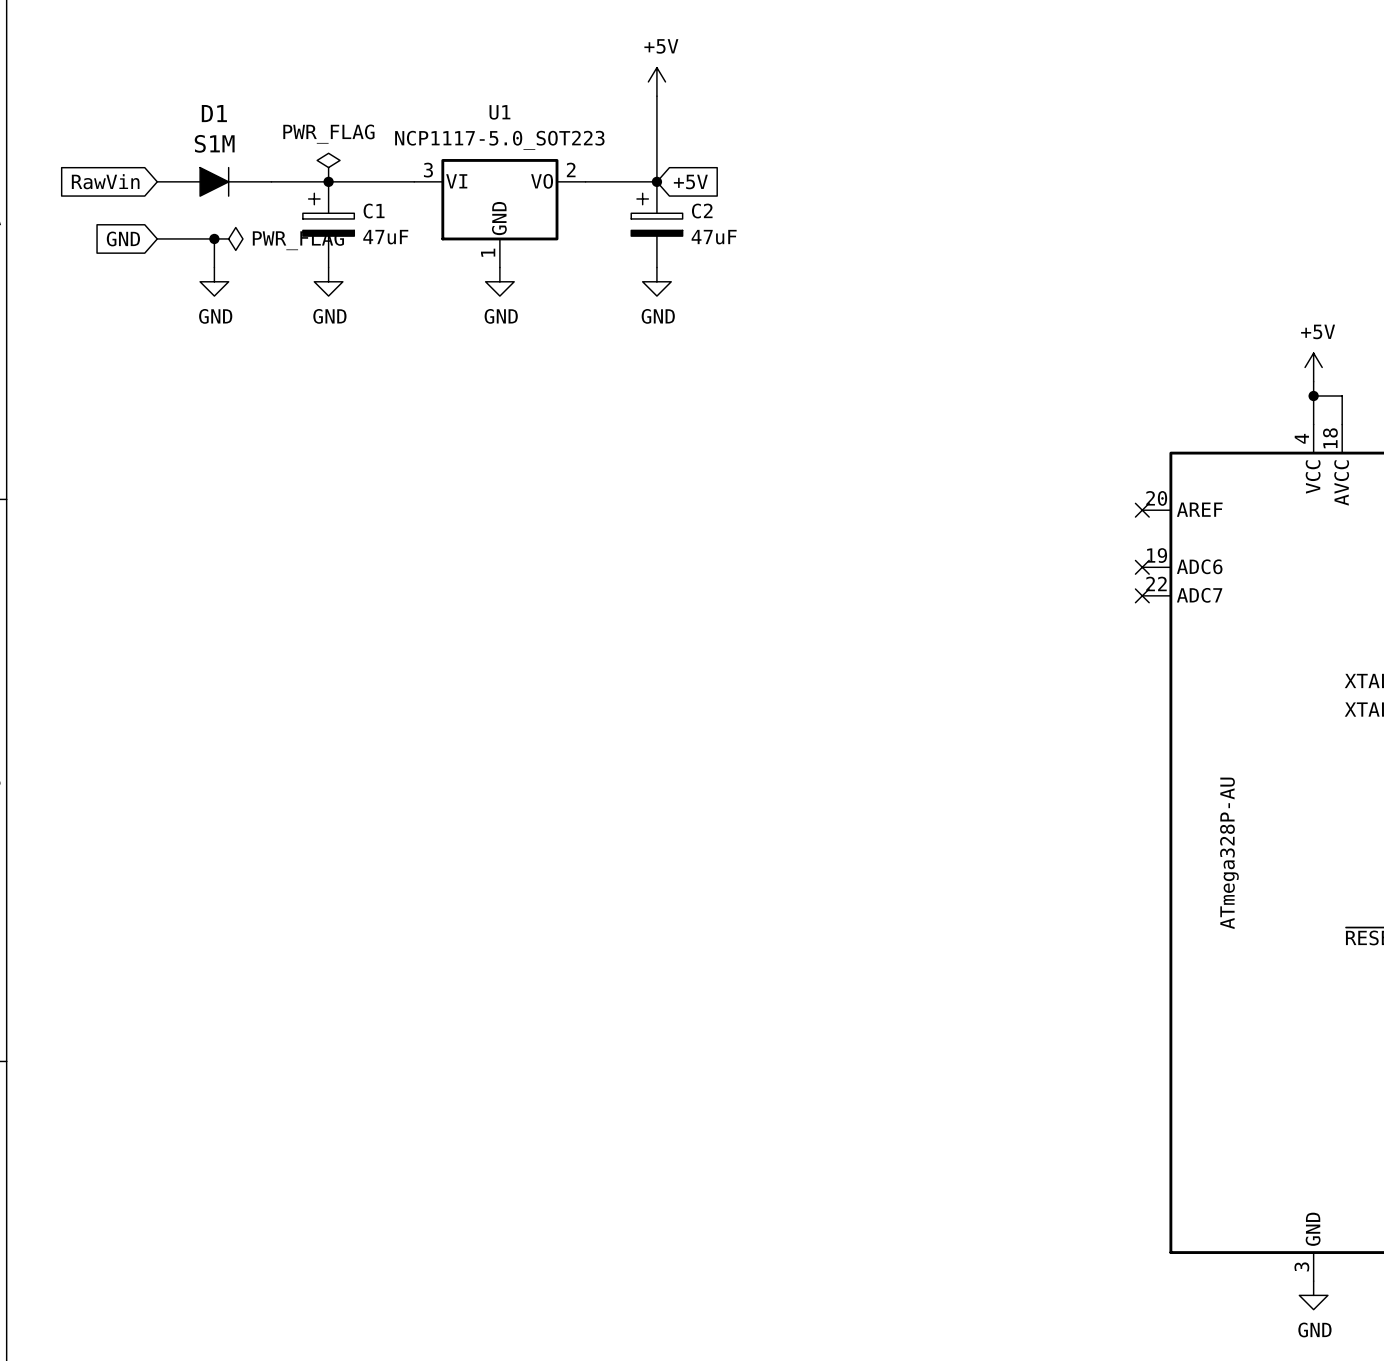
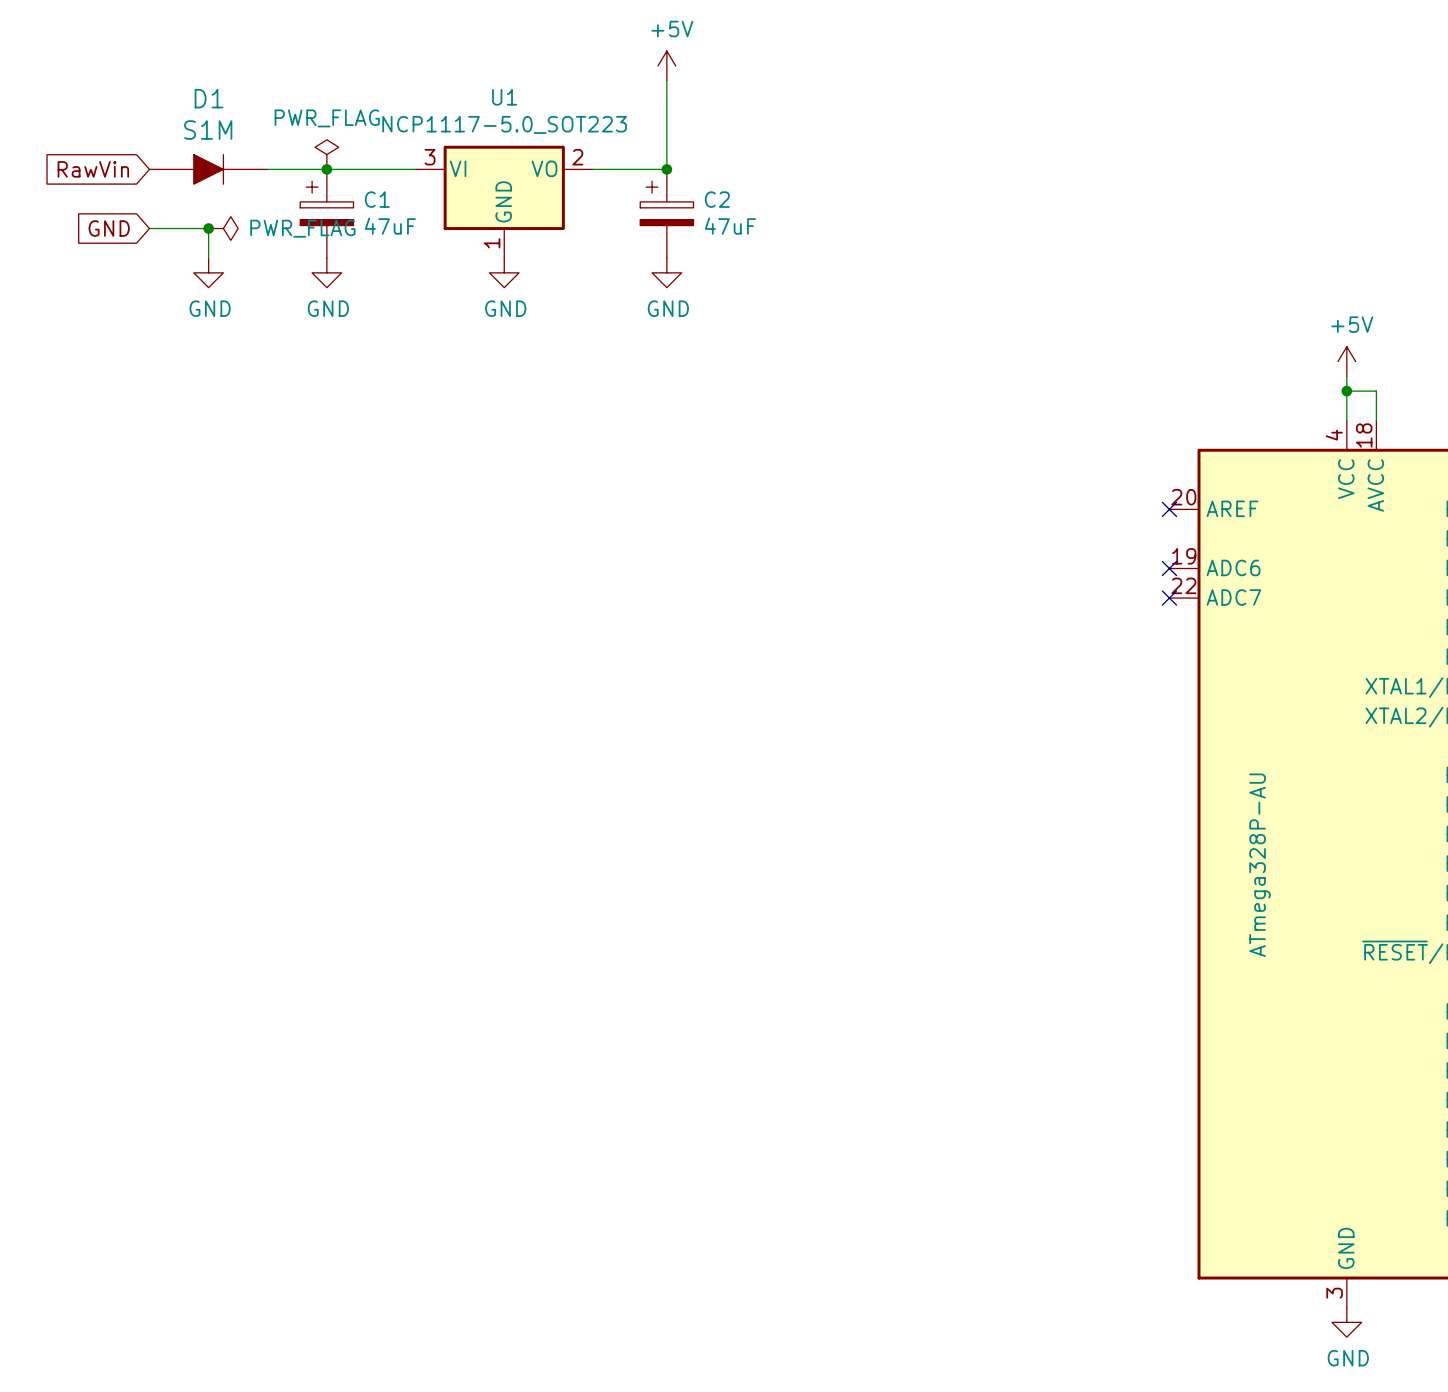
global label: +5V (690, 182) -> none

